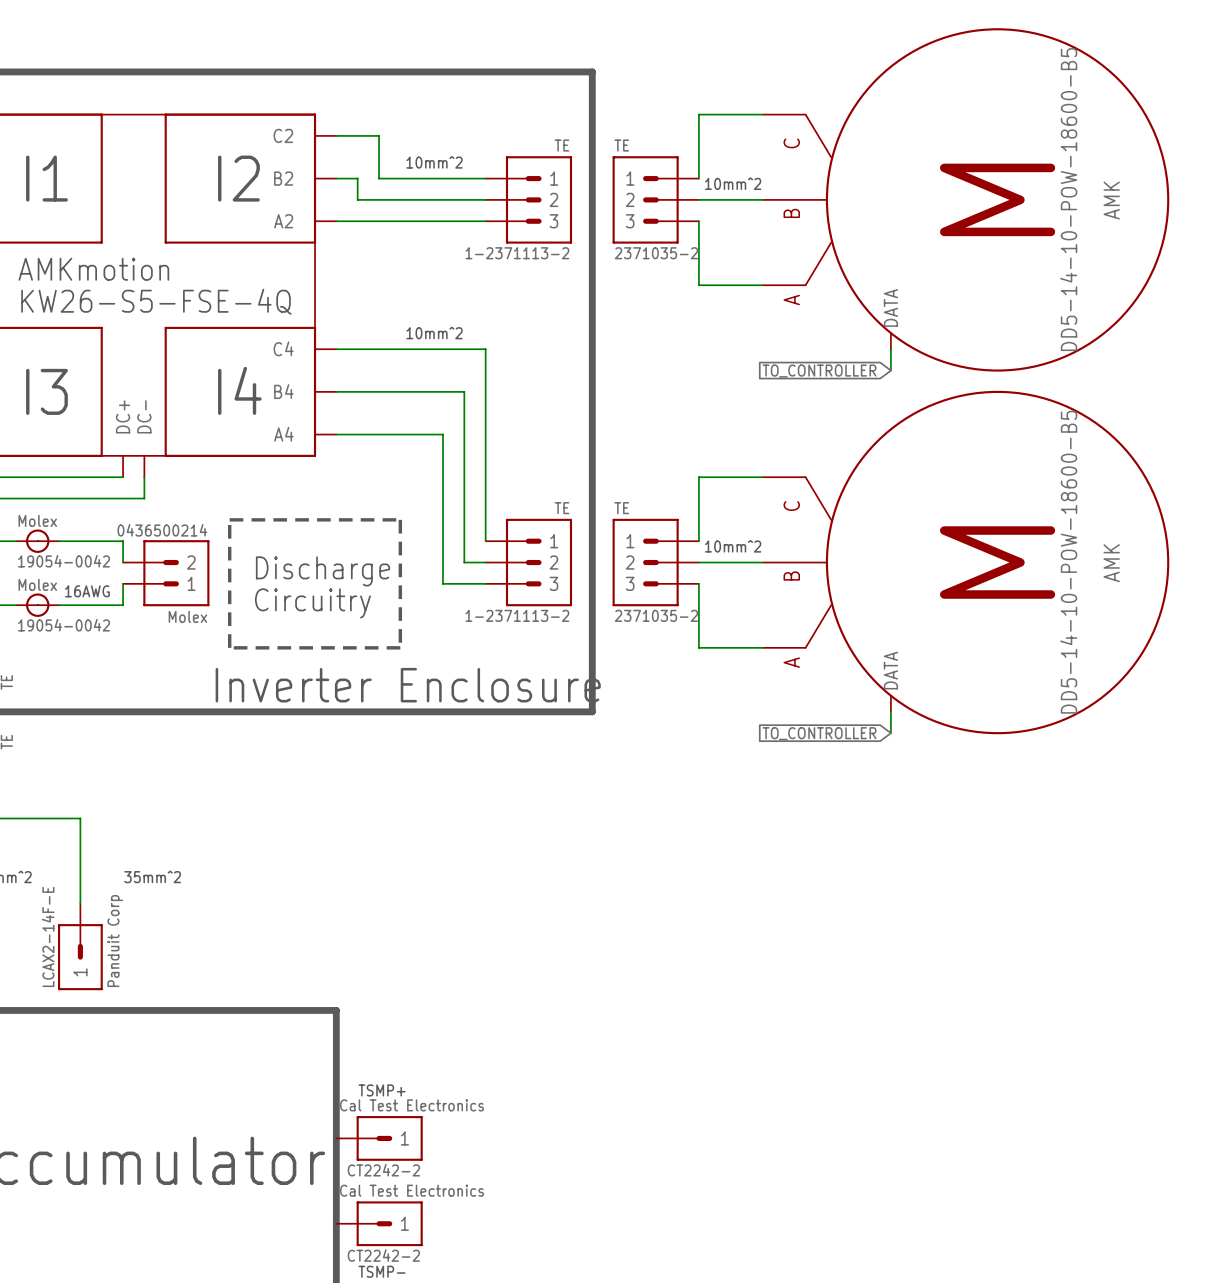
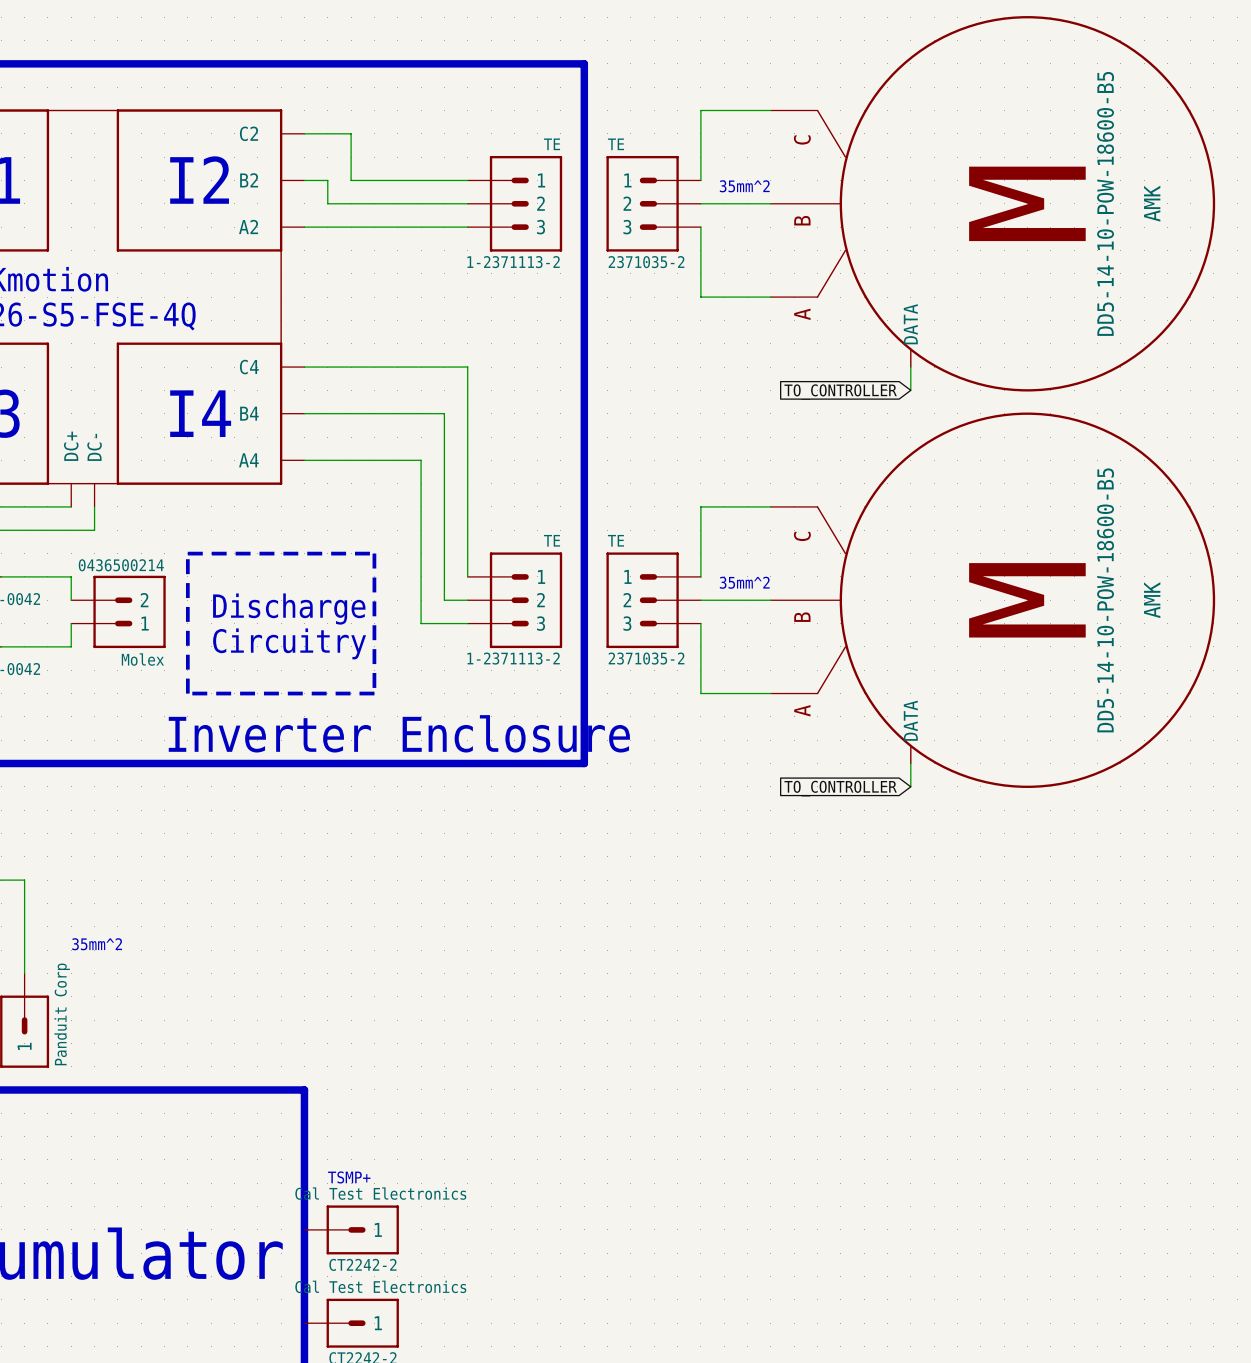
text: 10mm^2 (434, 162) -> none
text: 10mm^2 (733, 183) -> 35mm^2 (744, 186)
text: 10mm^2 (434, 332) -> none
text: 10mm^2 (733, 546) -> 35mm^2 (744, 582)
text: 16AWG (87, 591) -> none

